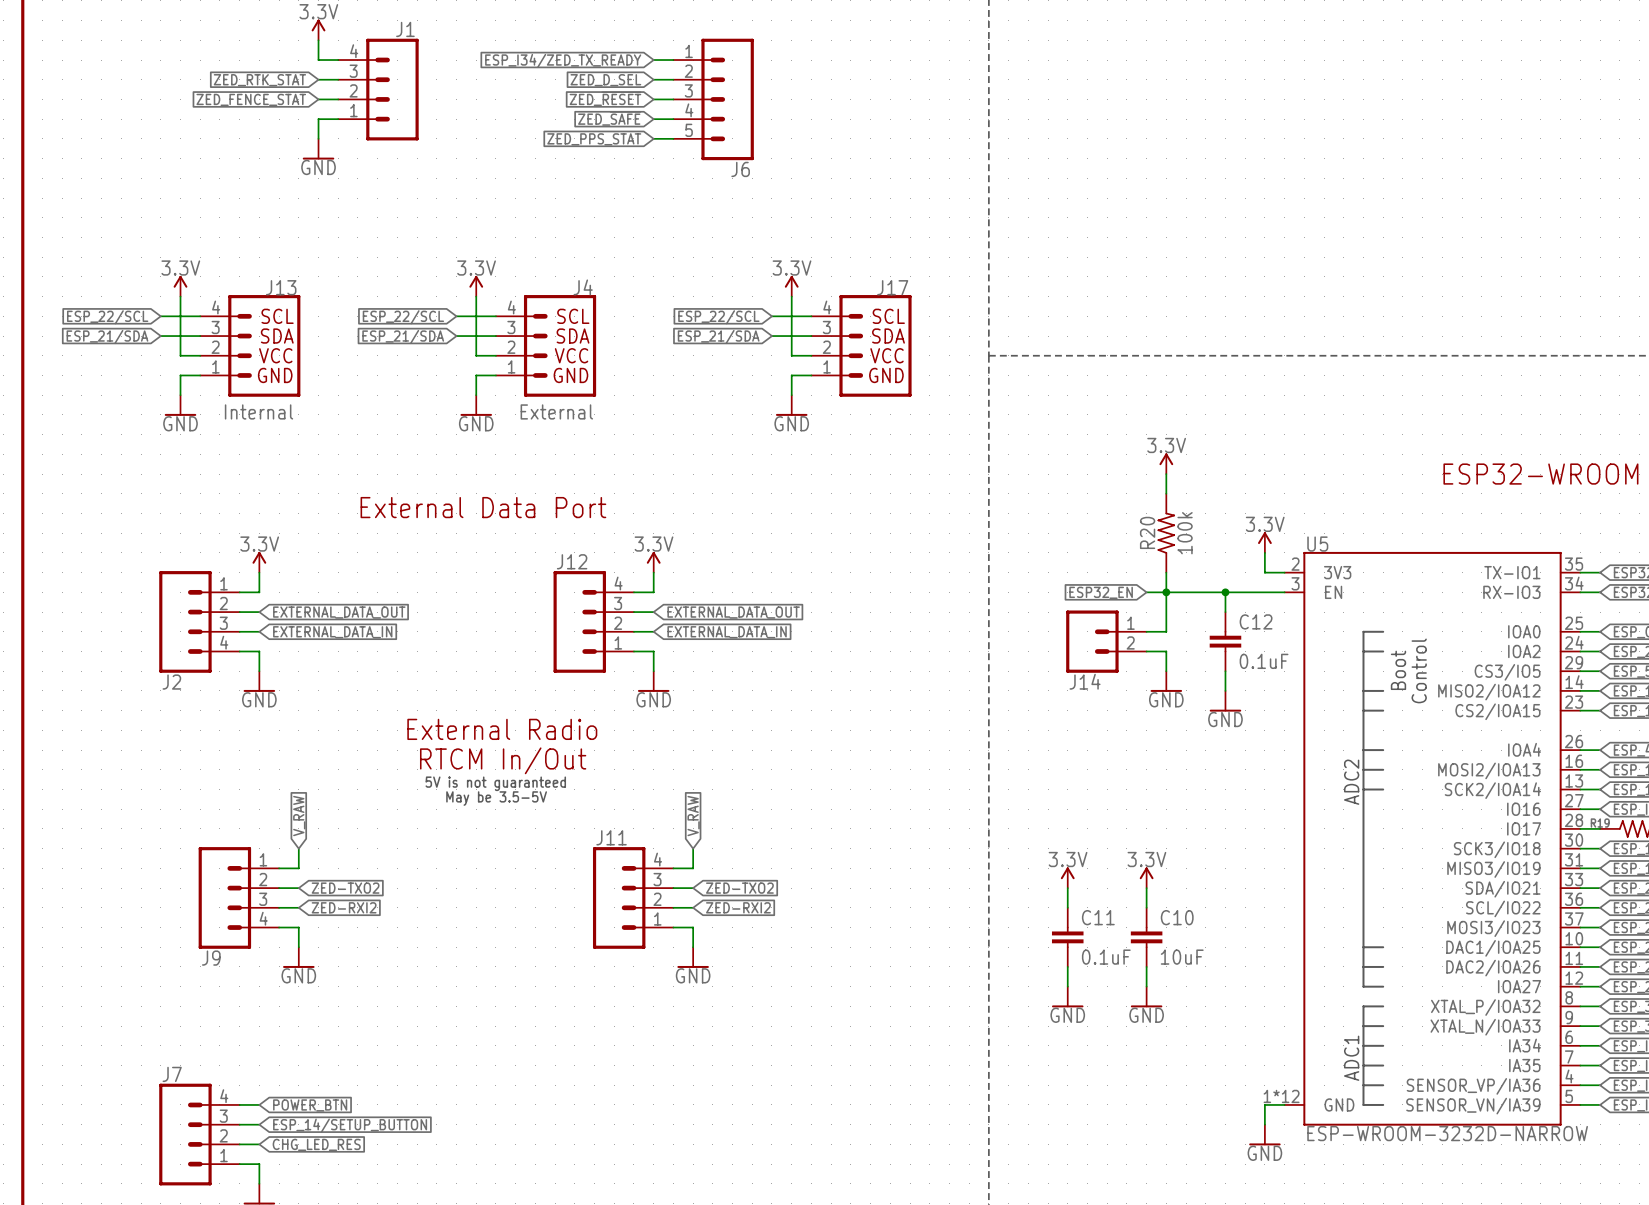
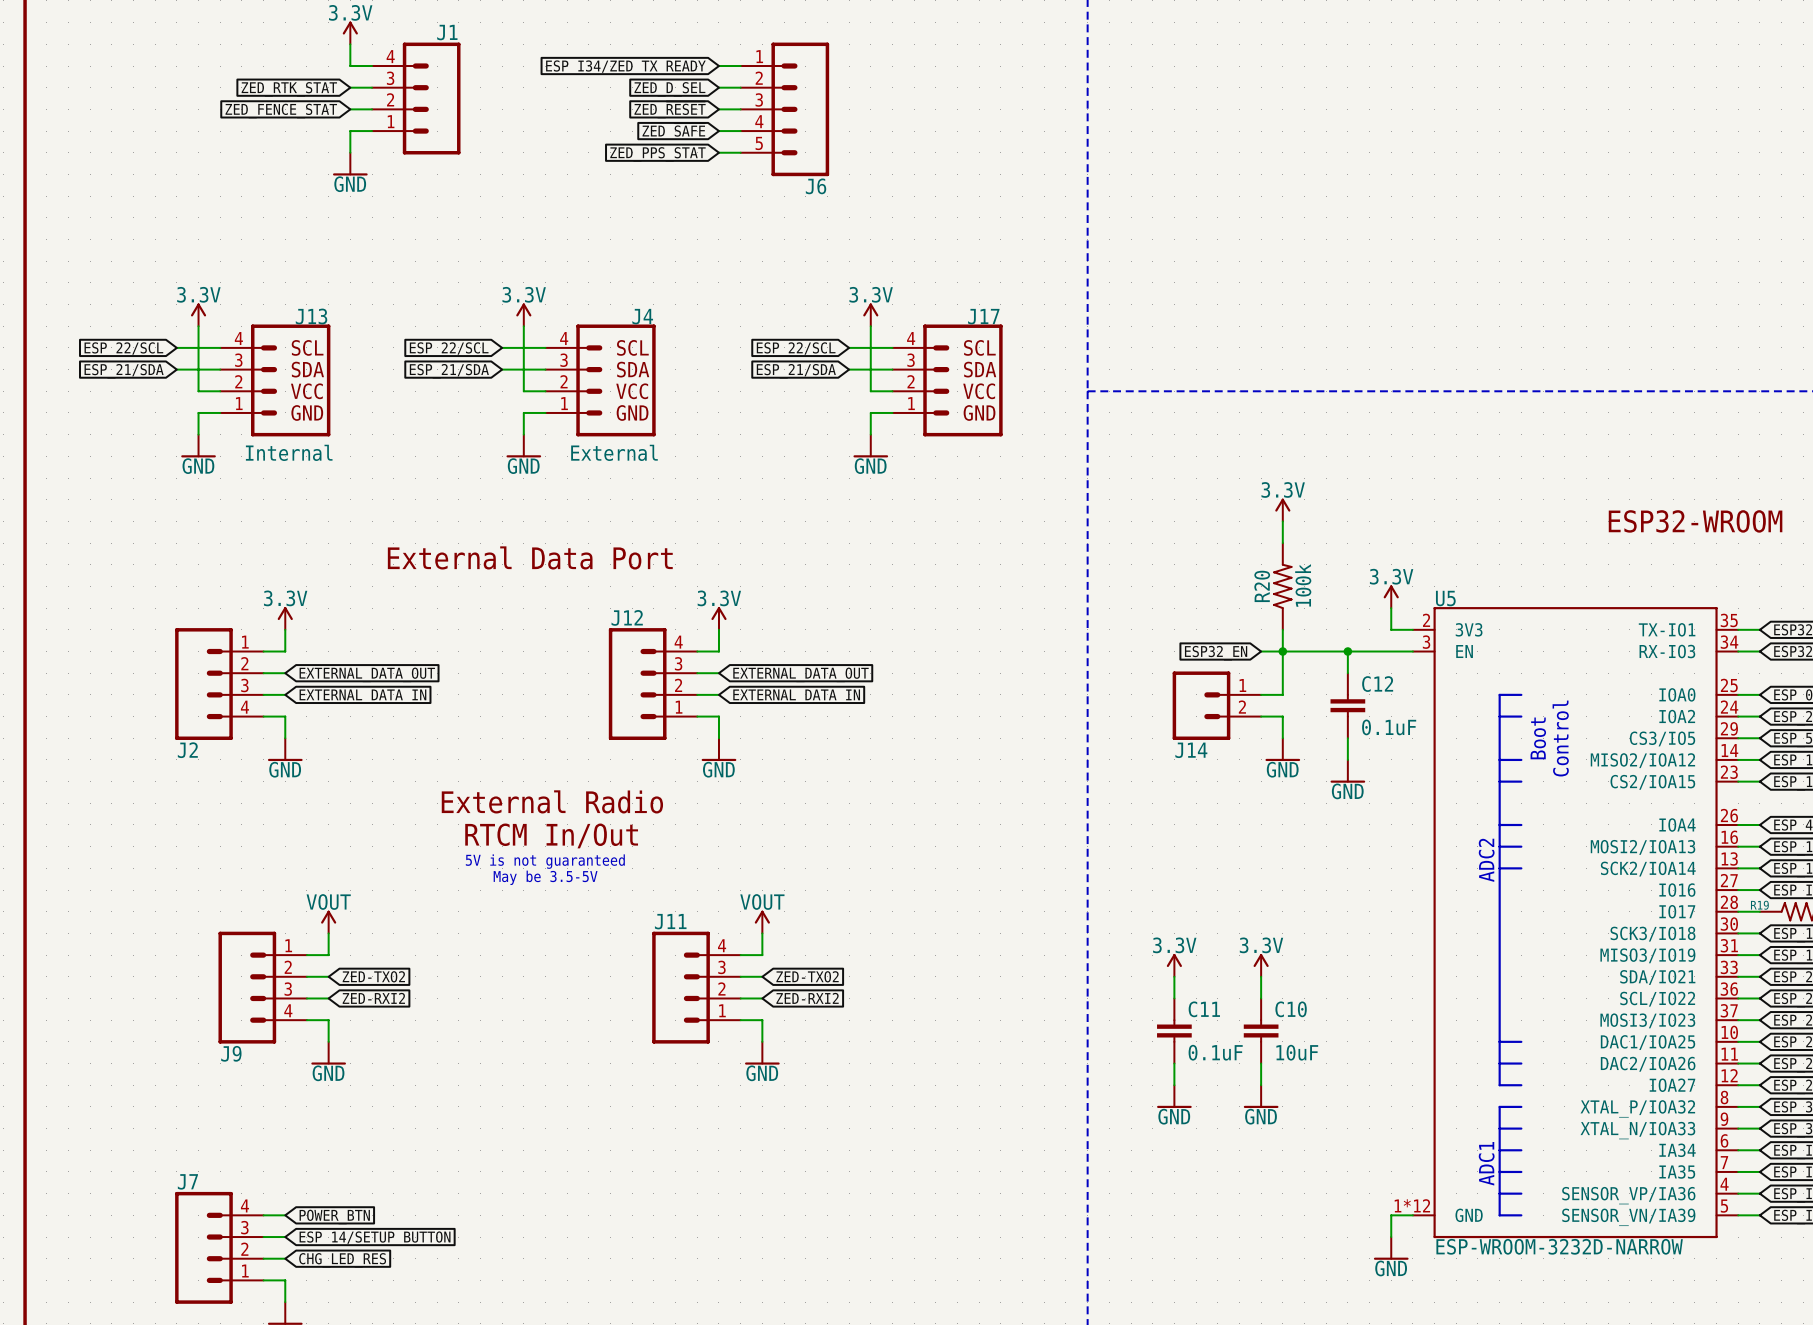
global label: V_RAW (299, 816) -> none
global label: V_RAW (693, 816) -> none
power symbol: none -> VOUT (328, 922)
power symbol: none -> VOUT (762, 922)

